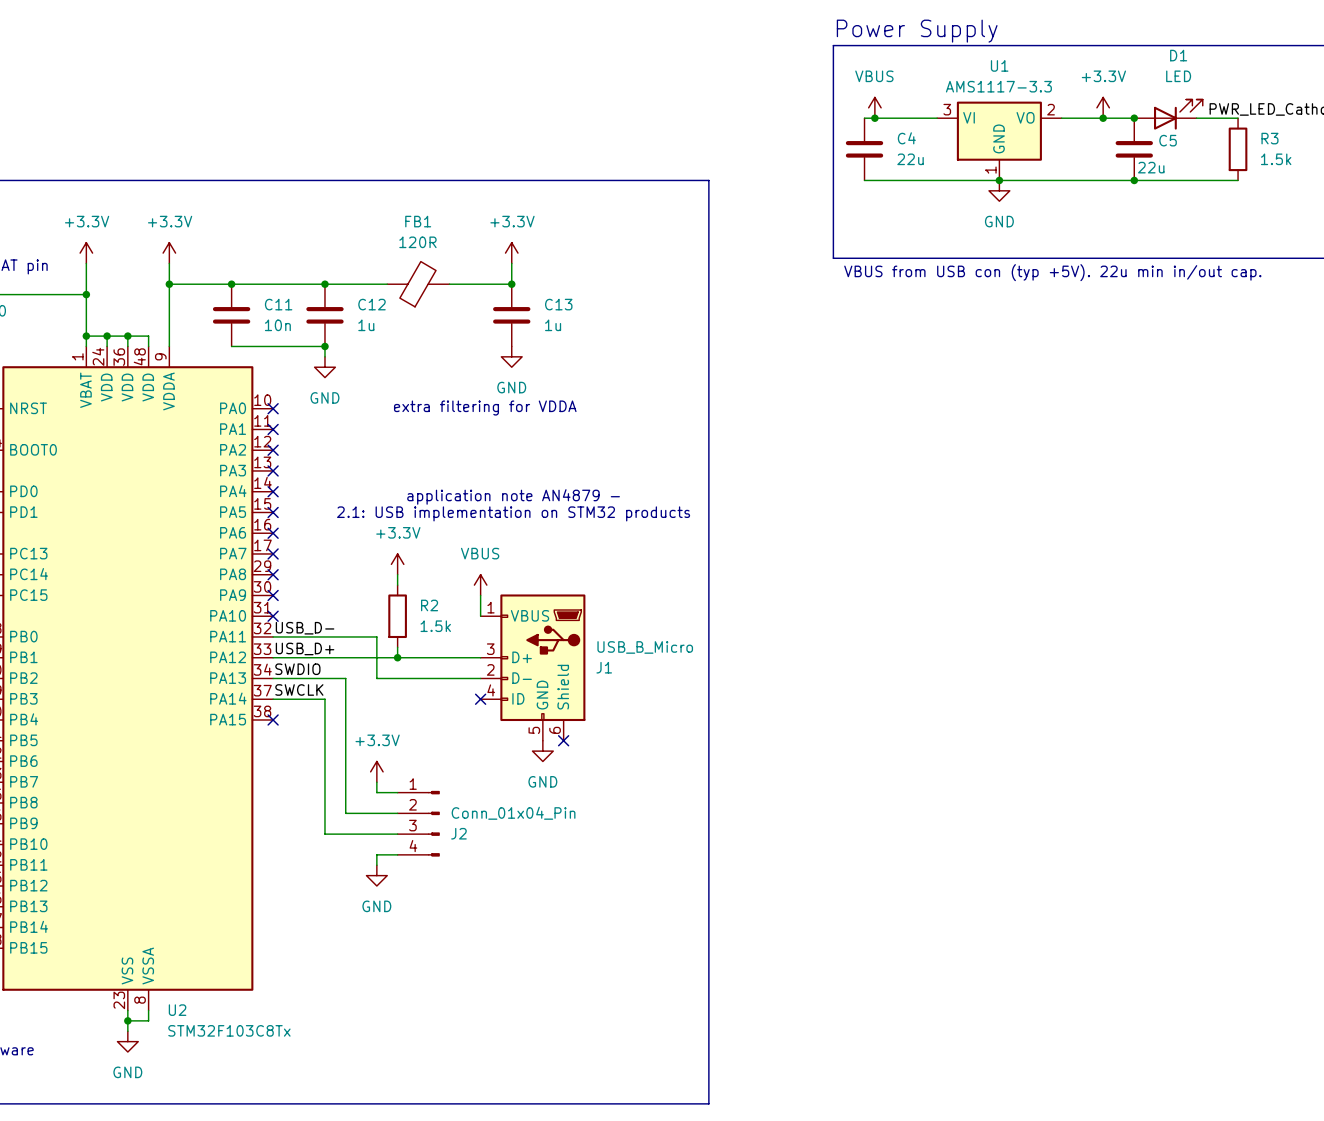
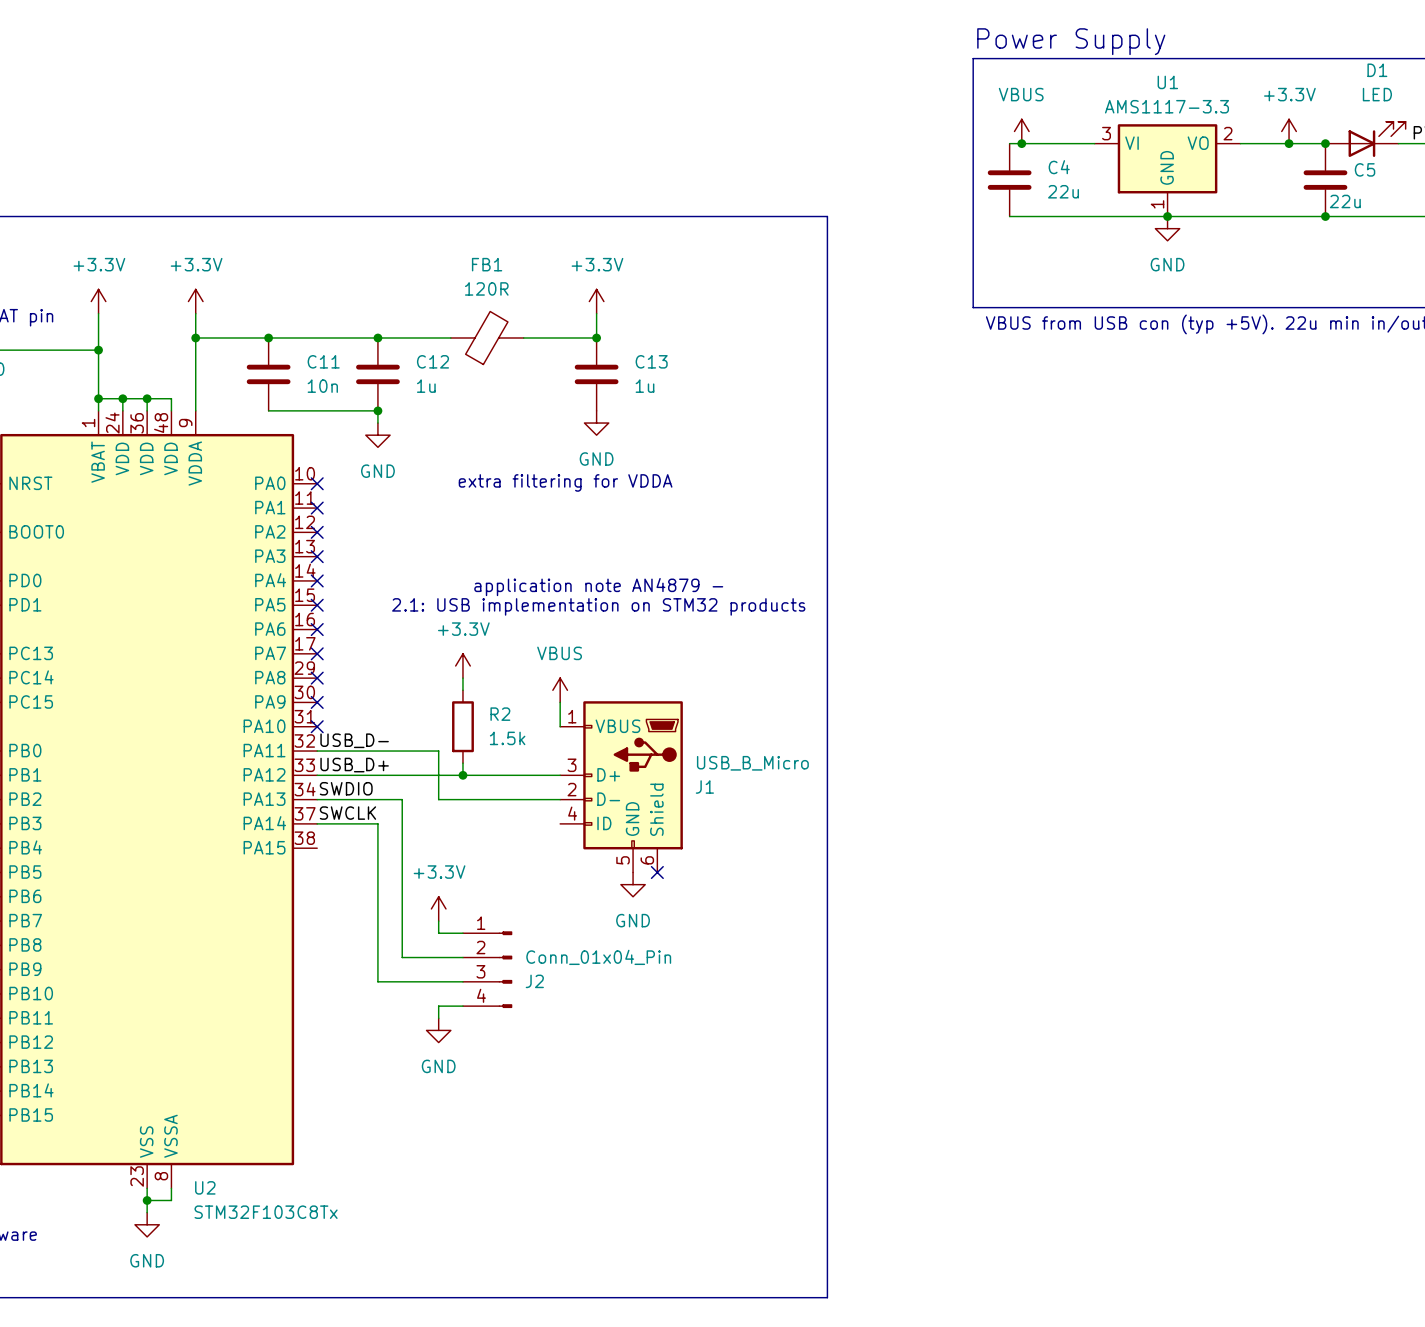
no-connect mark: (480, 699) -> none
no-connect mark: (273, 719) -> none

